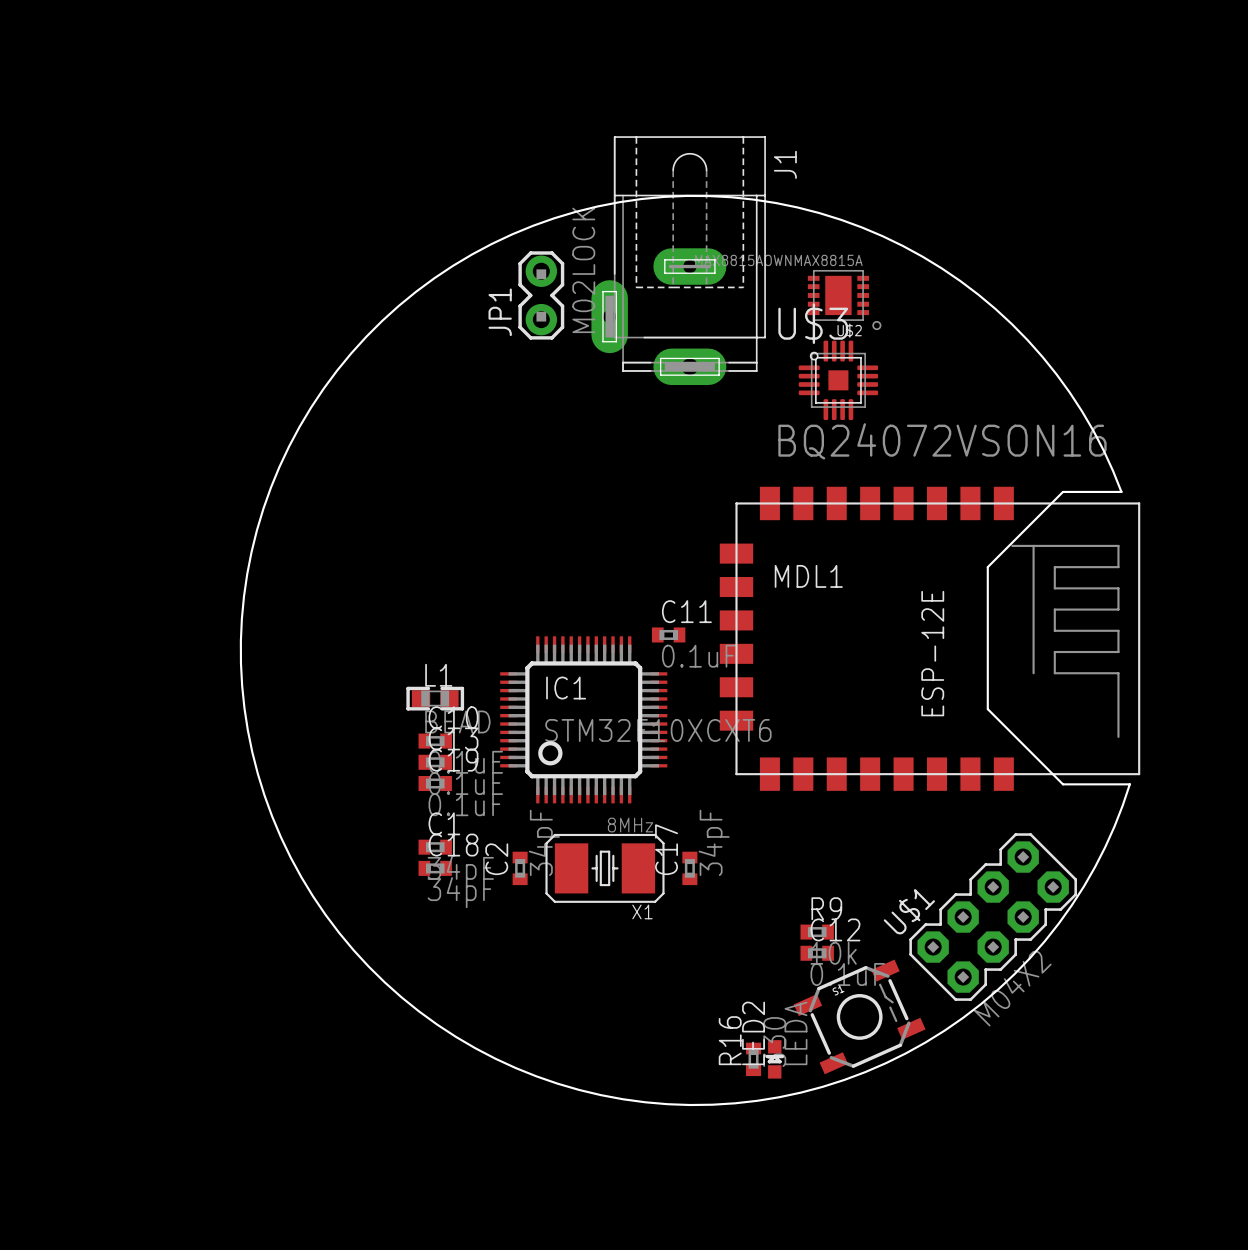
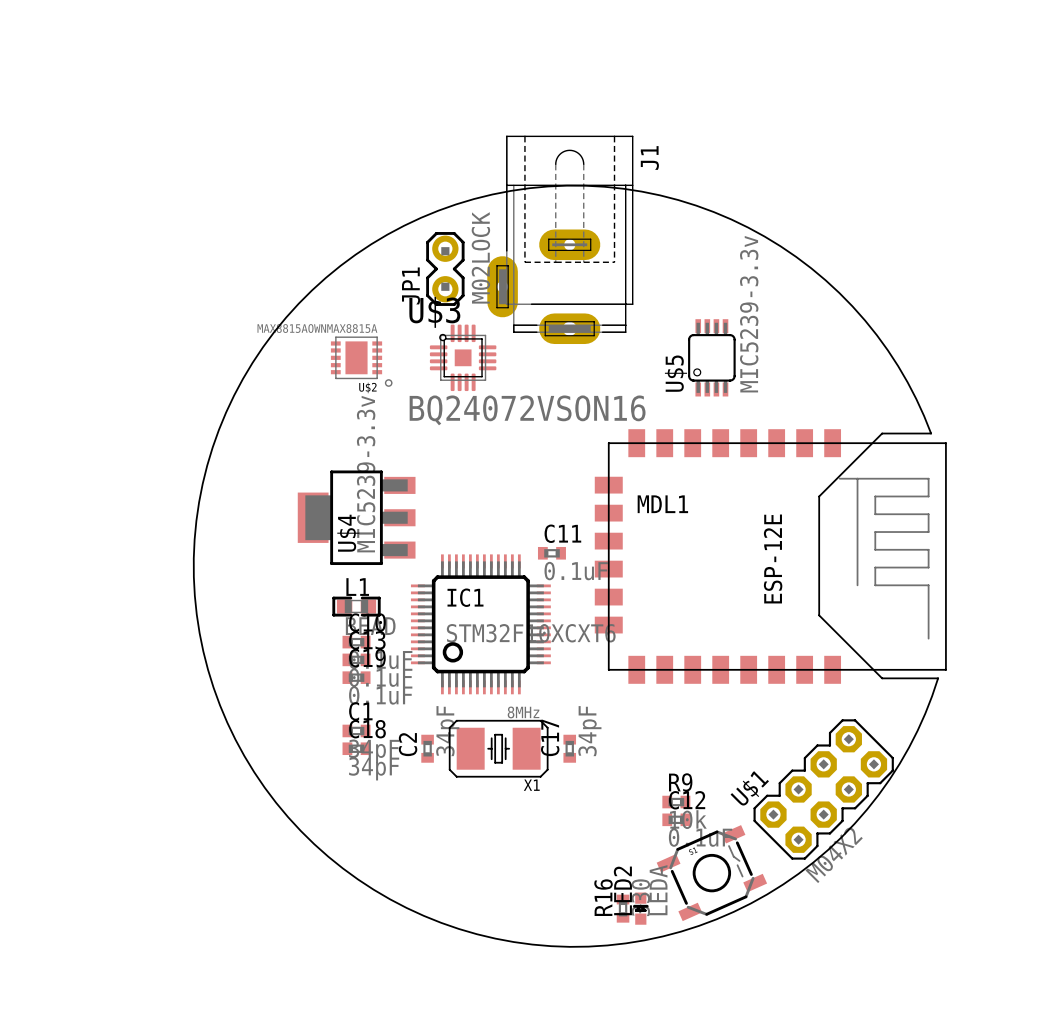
U$2 position: (844, 300) -> (361, 361)
U$3 position: (838, 380) -> (463, 357)
U$5: none -> MIC5239-3.3v (711, 357)
U$4: none -> MIC5239-3.3v (356, 517)

